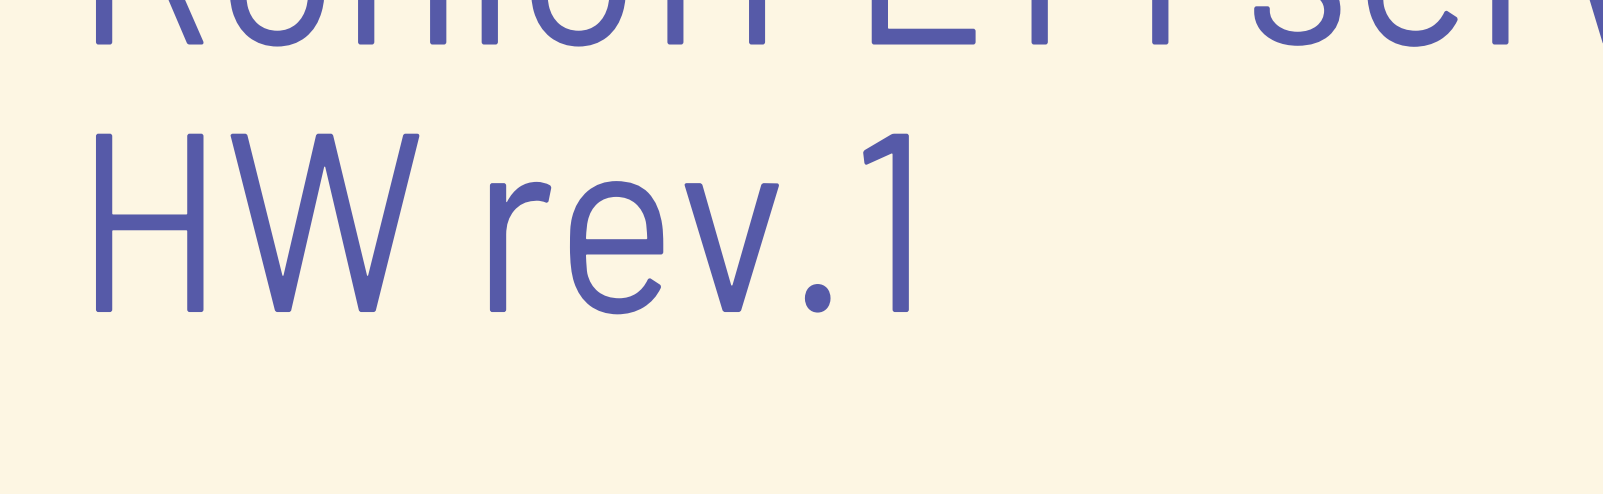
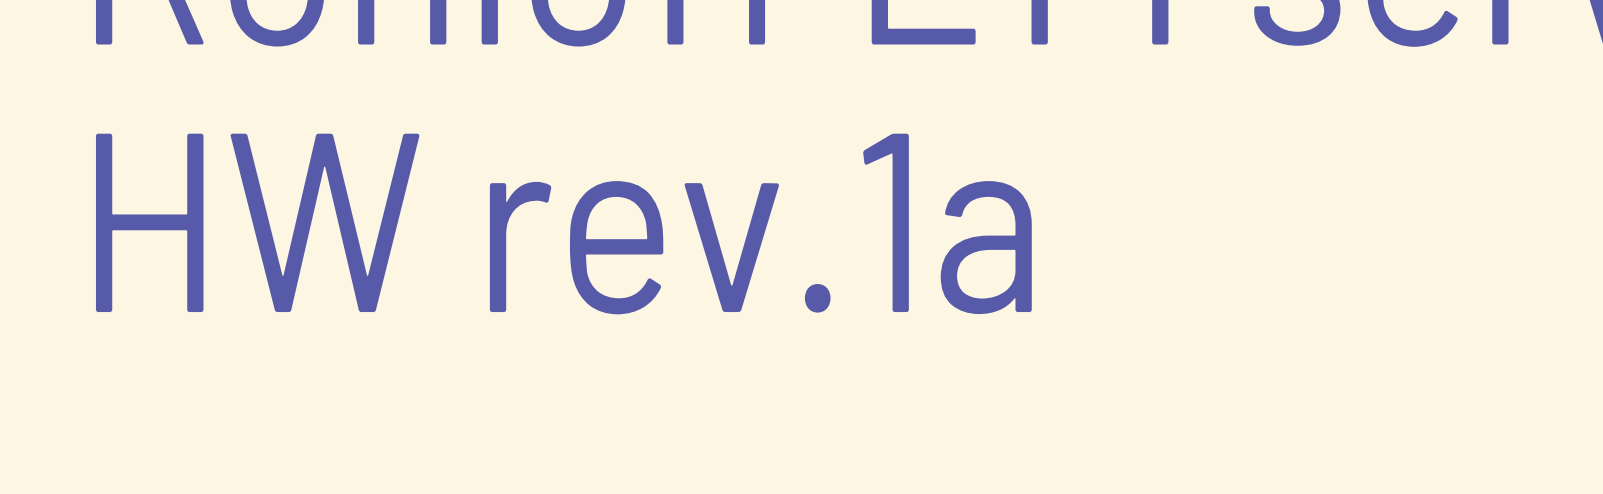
text: HW rev.1 (502, 224) -> HW rev.1a (563, 224)

